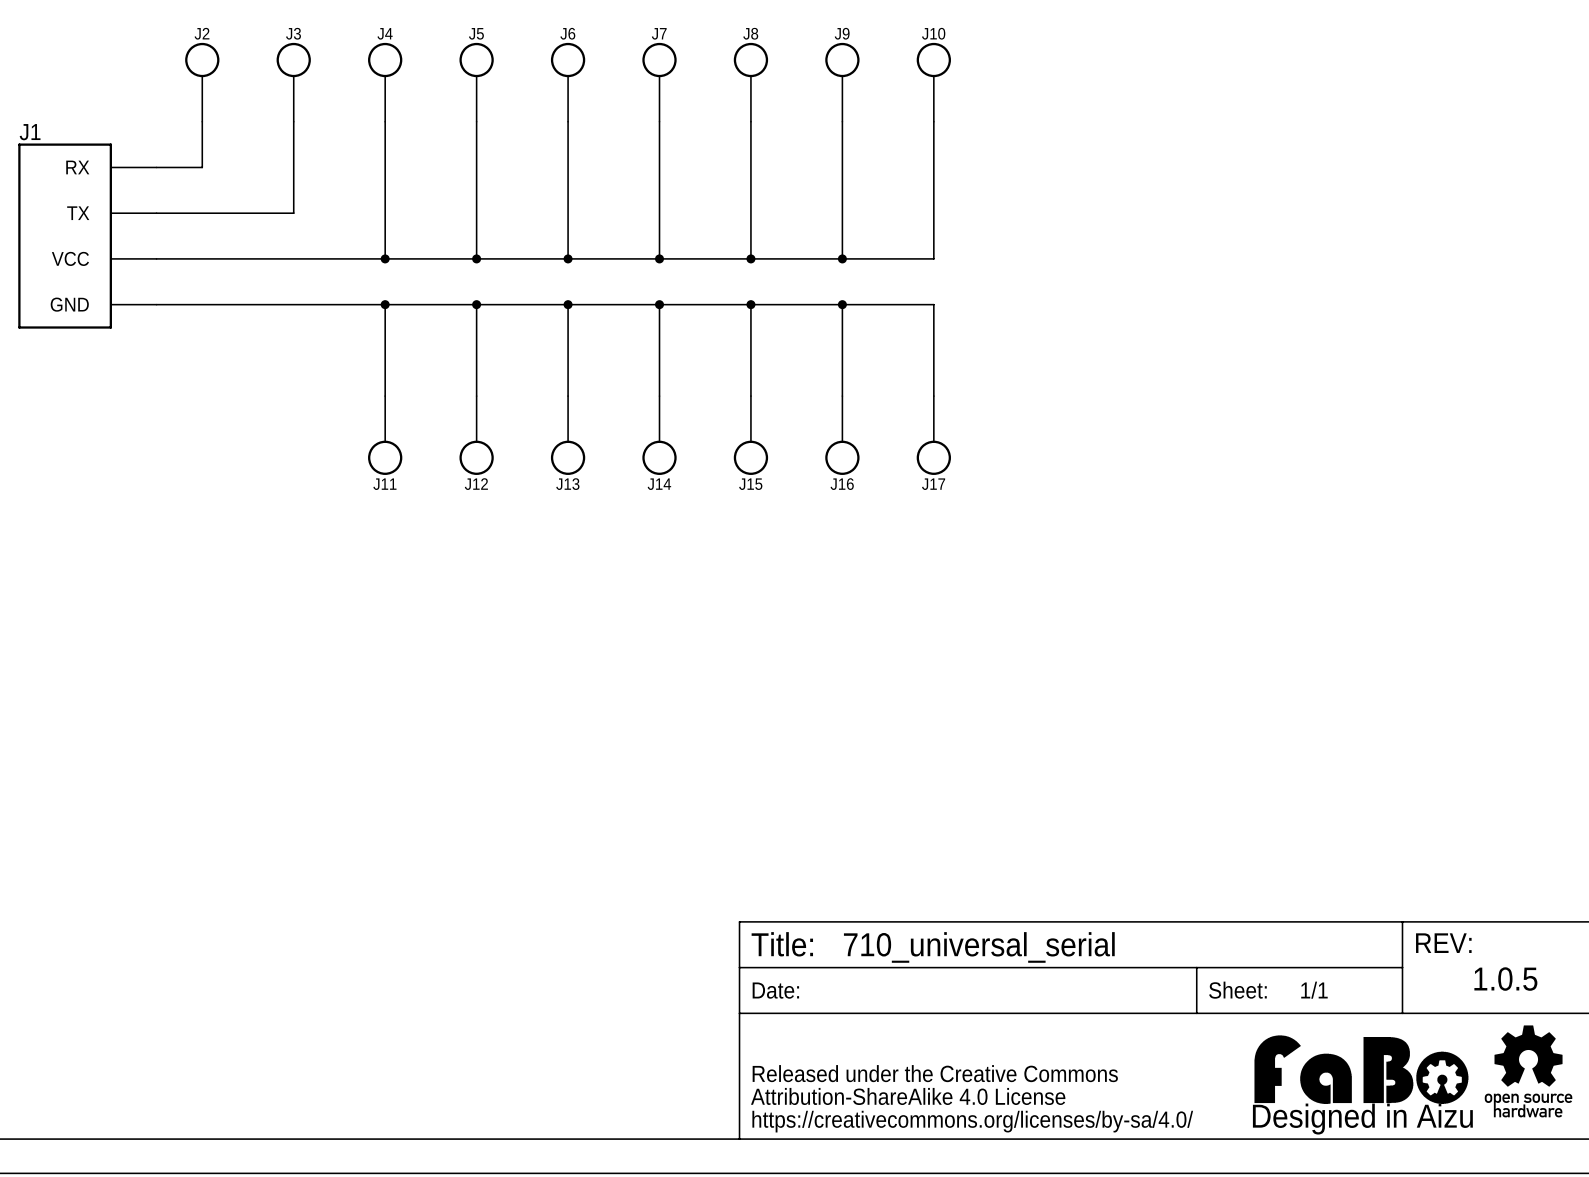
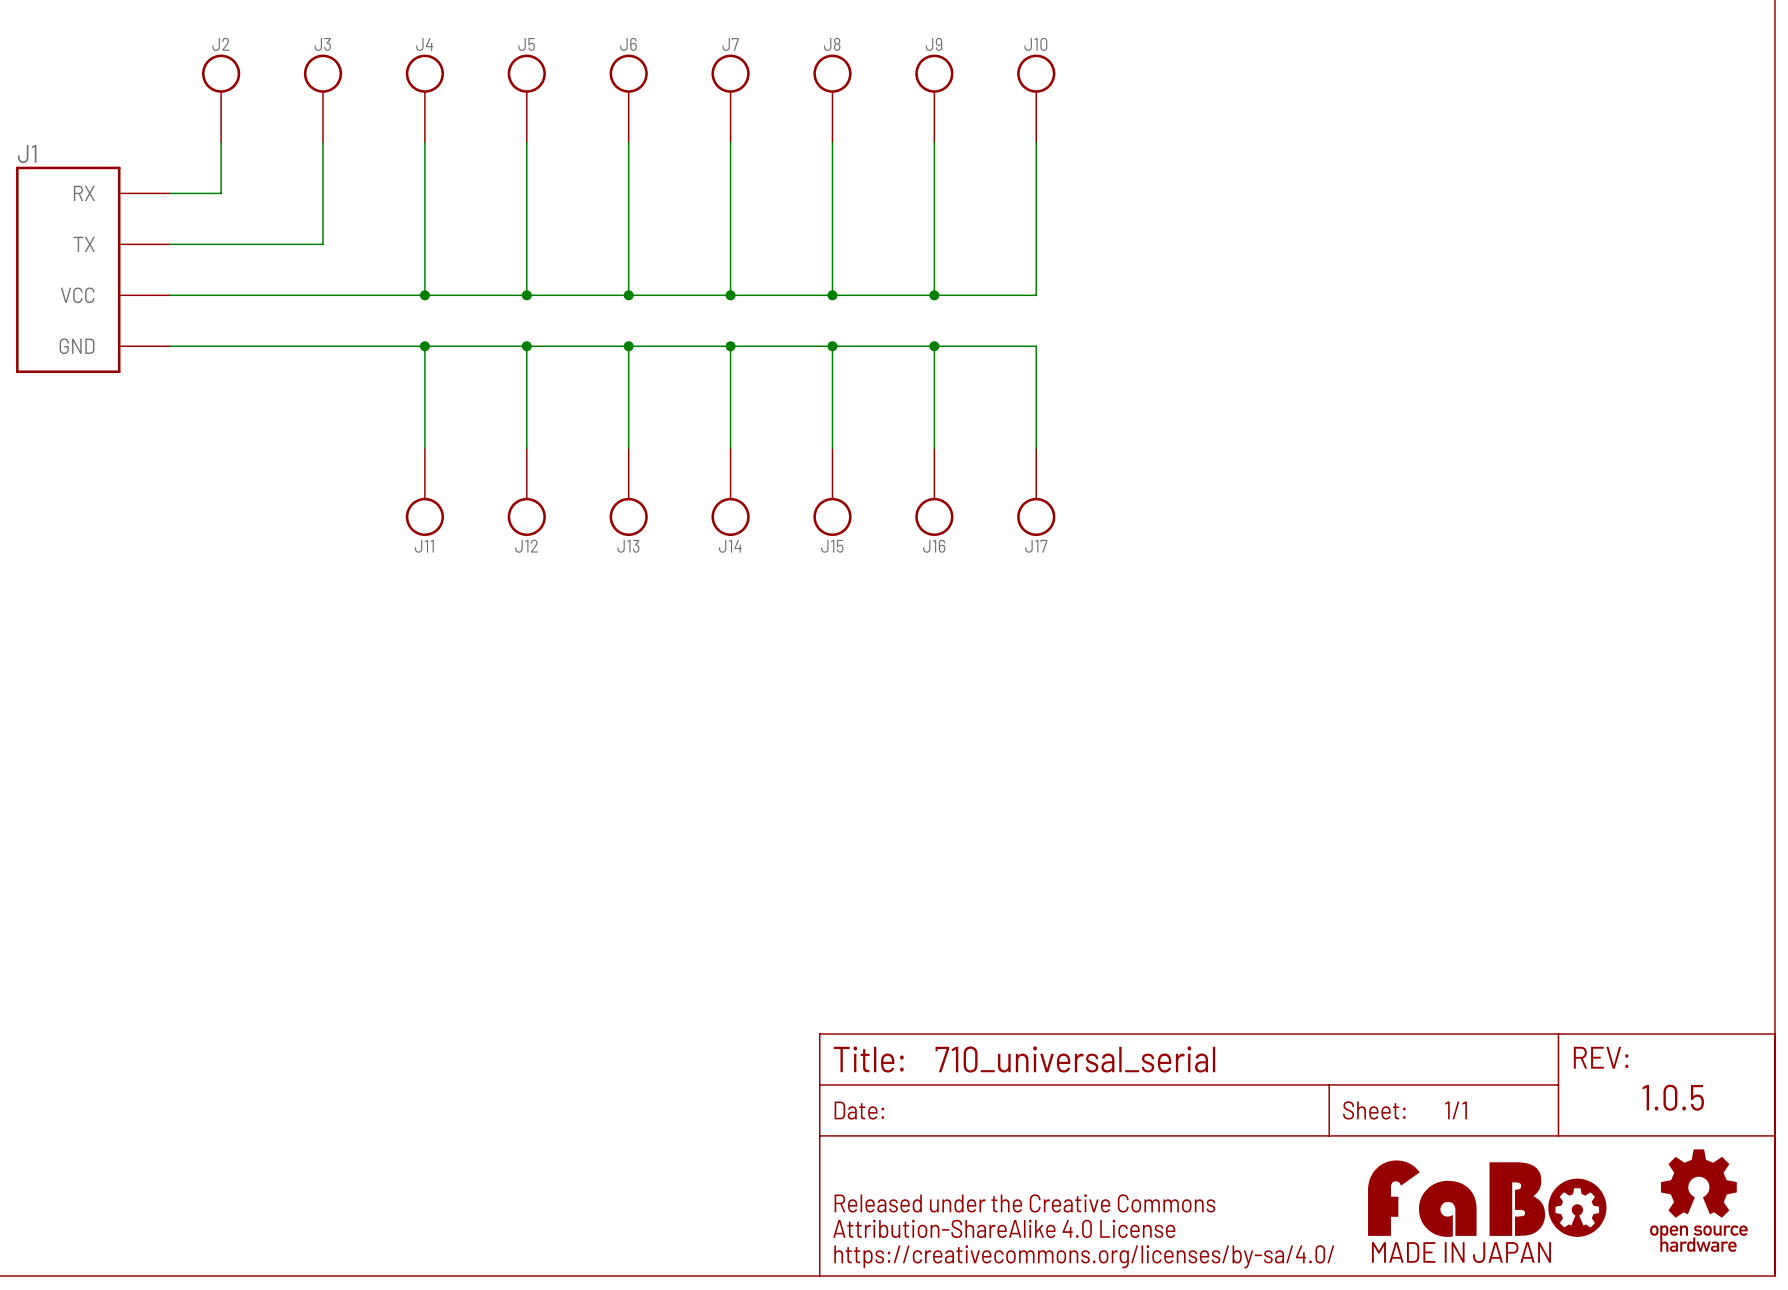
part: none -> (1487, 1198)
part: (1361, 1069) -> none

